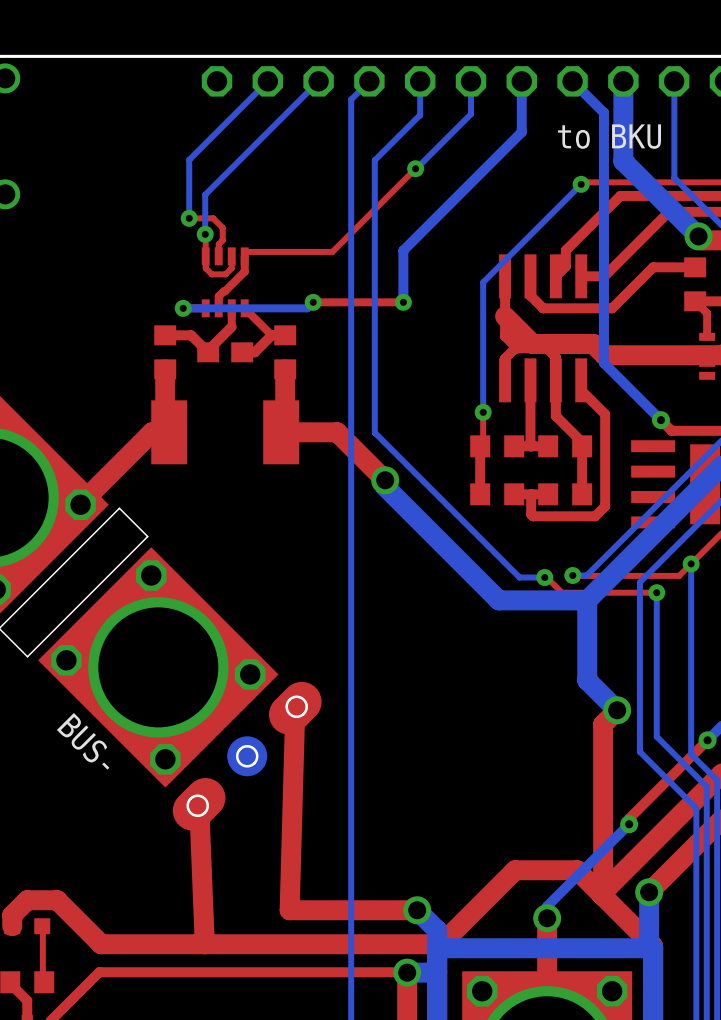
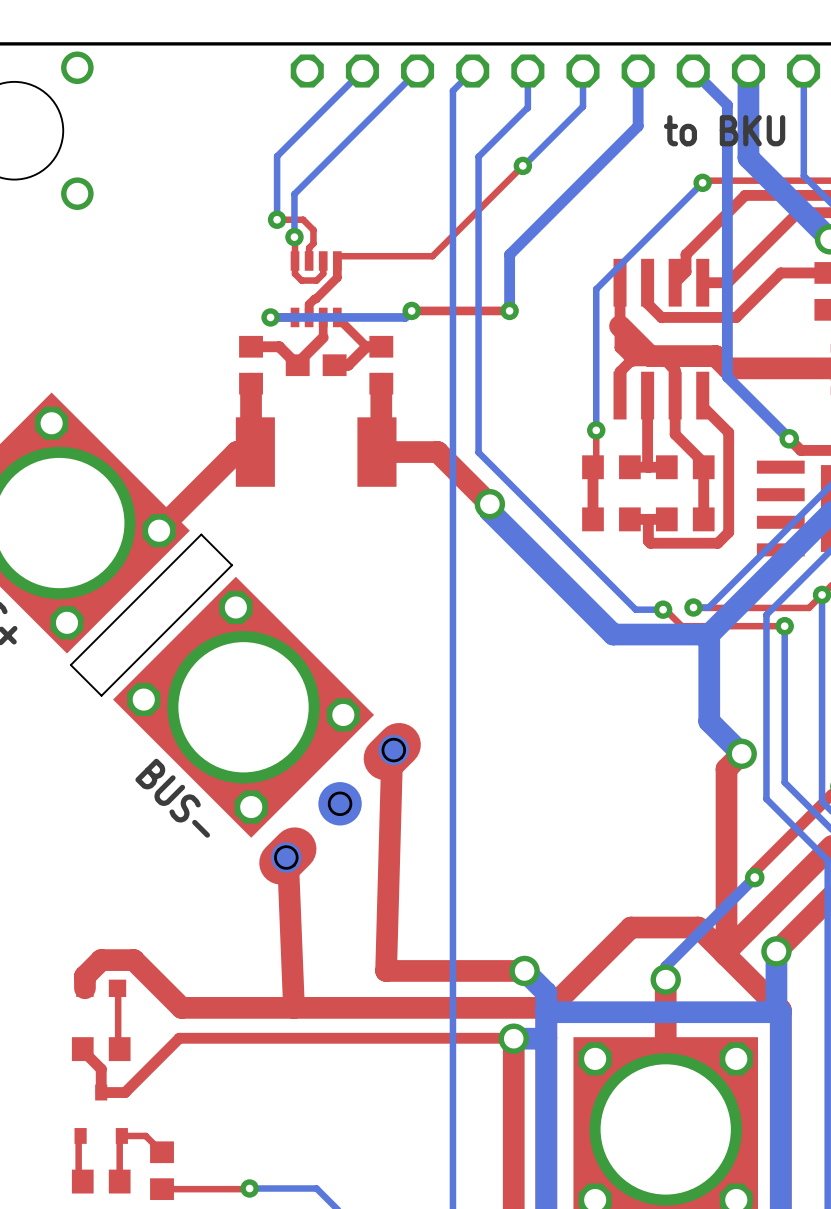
part footprint: [172, 681, 322, 831] -> [259, 722, 421, 885]

